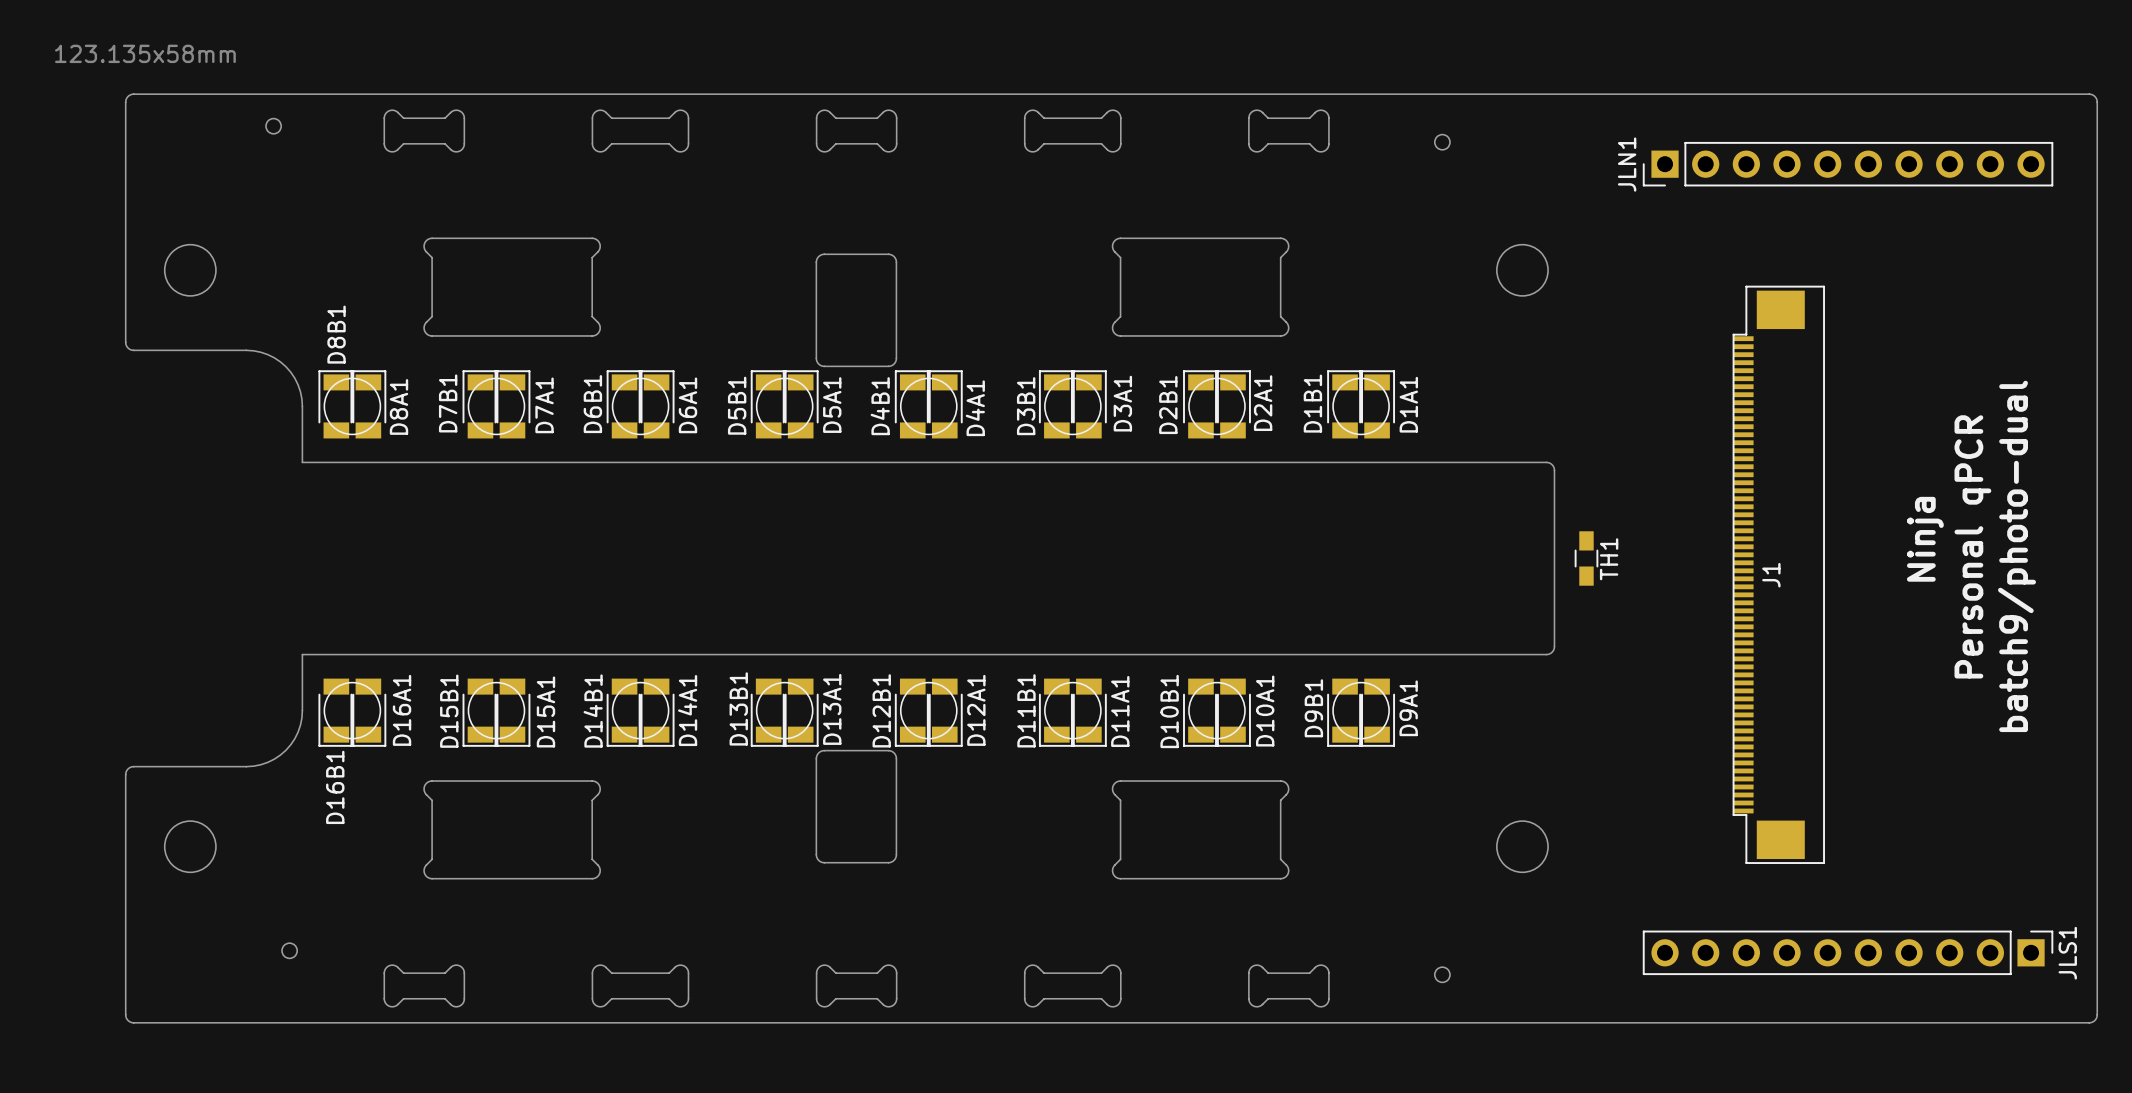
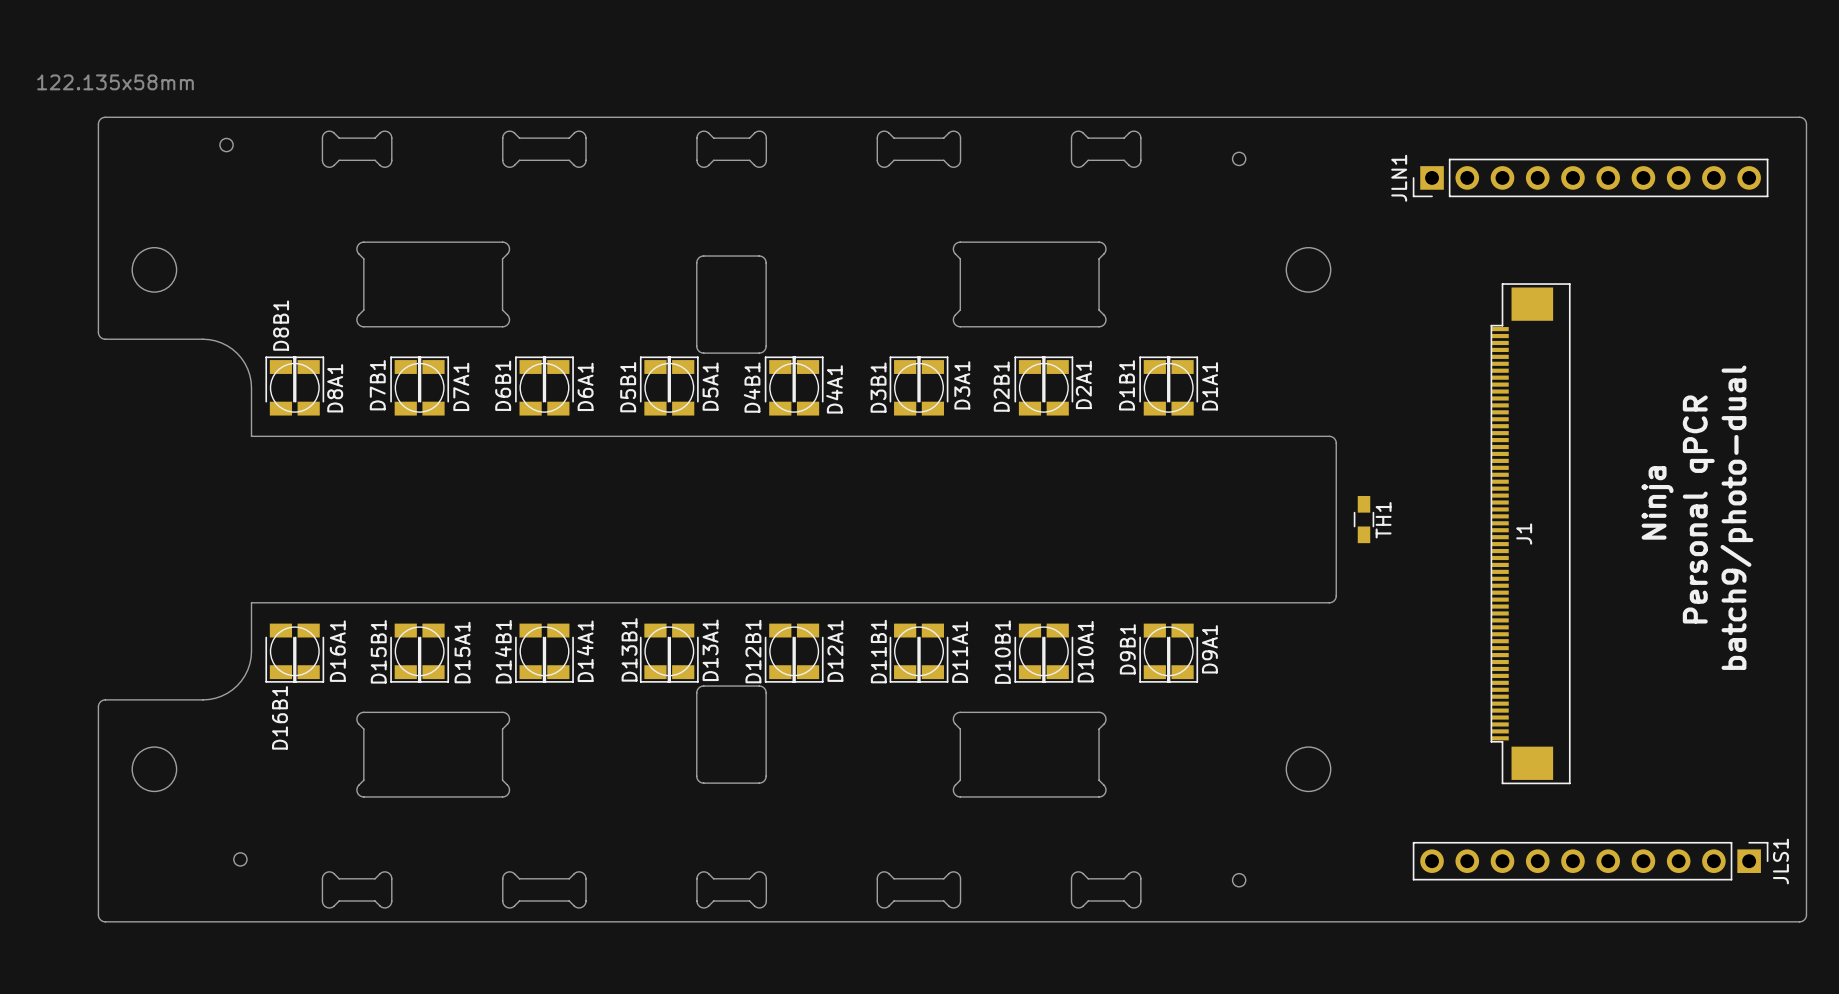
text: 123.135x58mm (145, 53) -> 122.135x58mm (115, 82)

